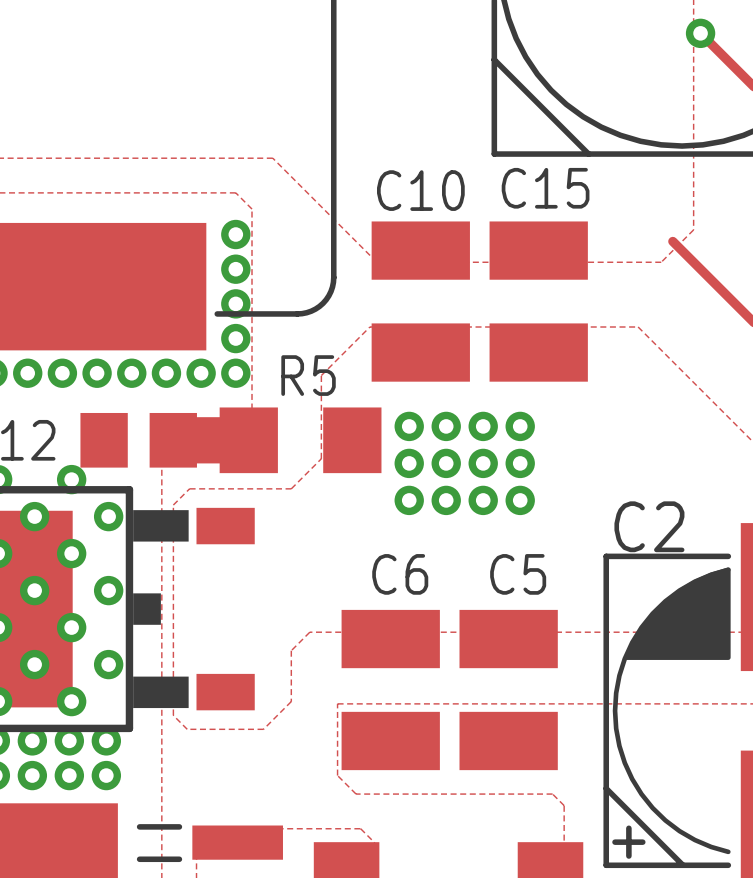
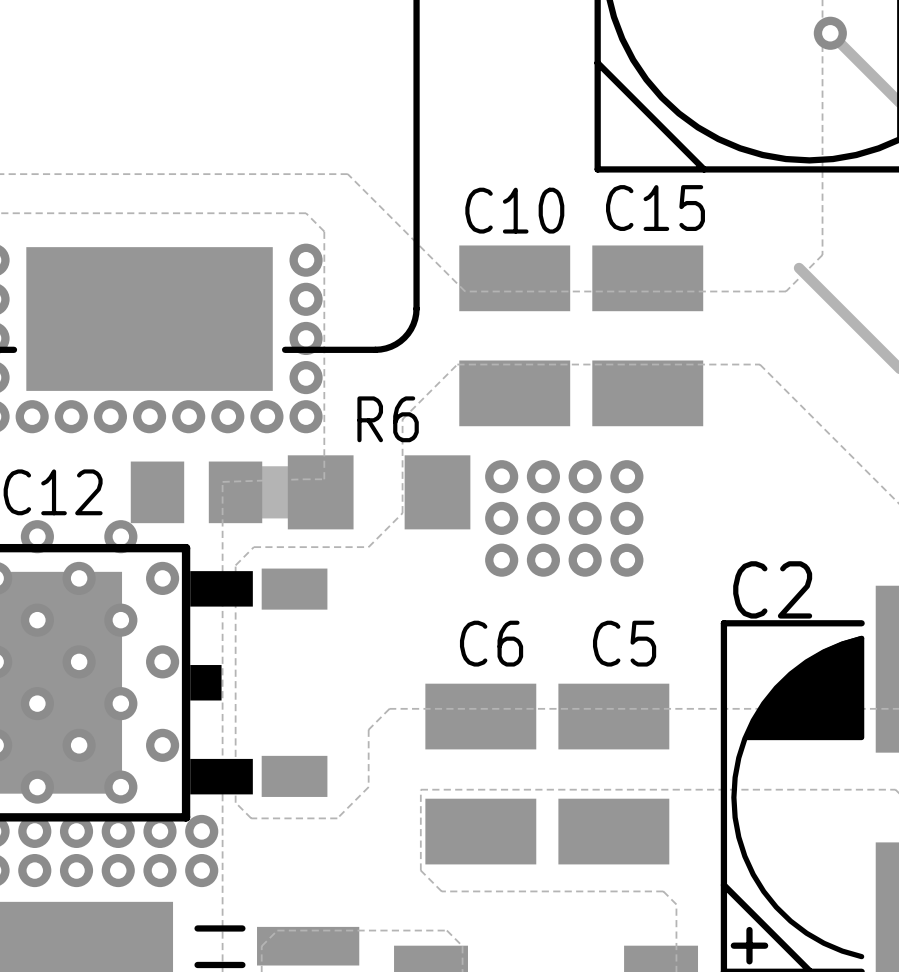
R5 name: R5 (308, 375) -> R6 (388, 419)
via: none -> (201, 831)
via: none -> (201, 870)

